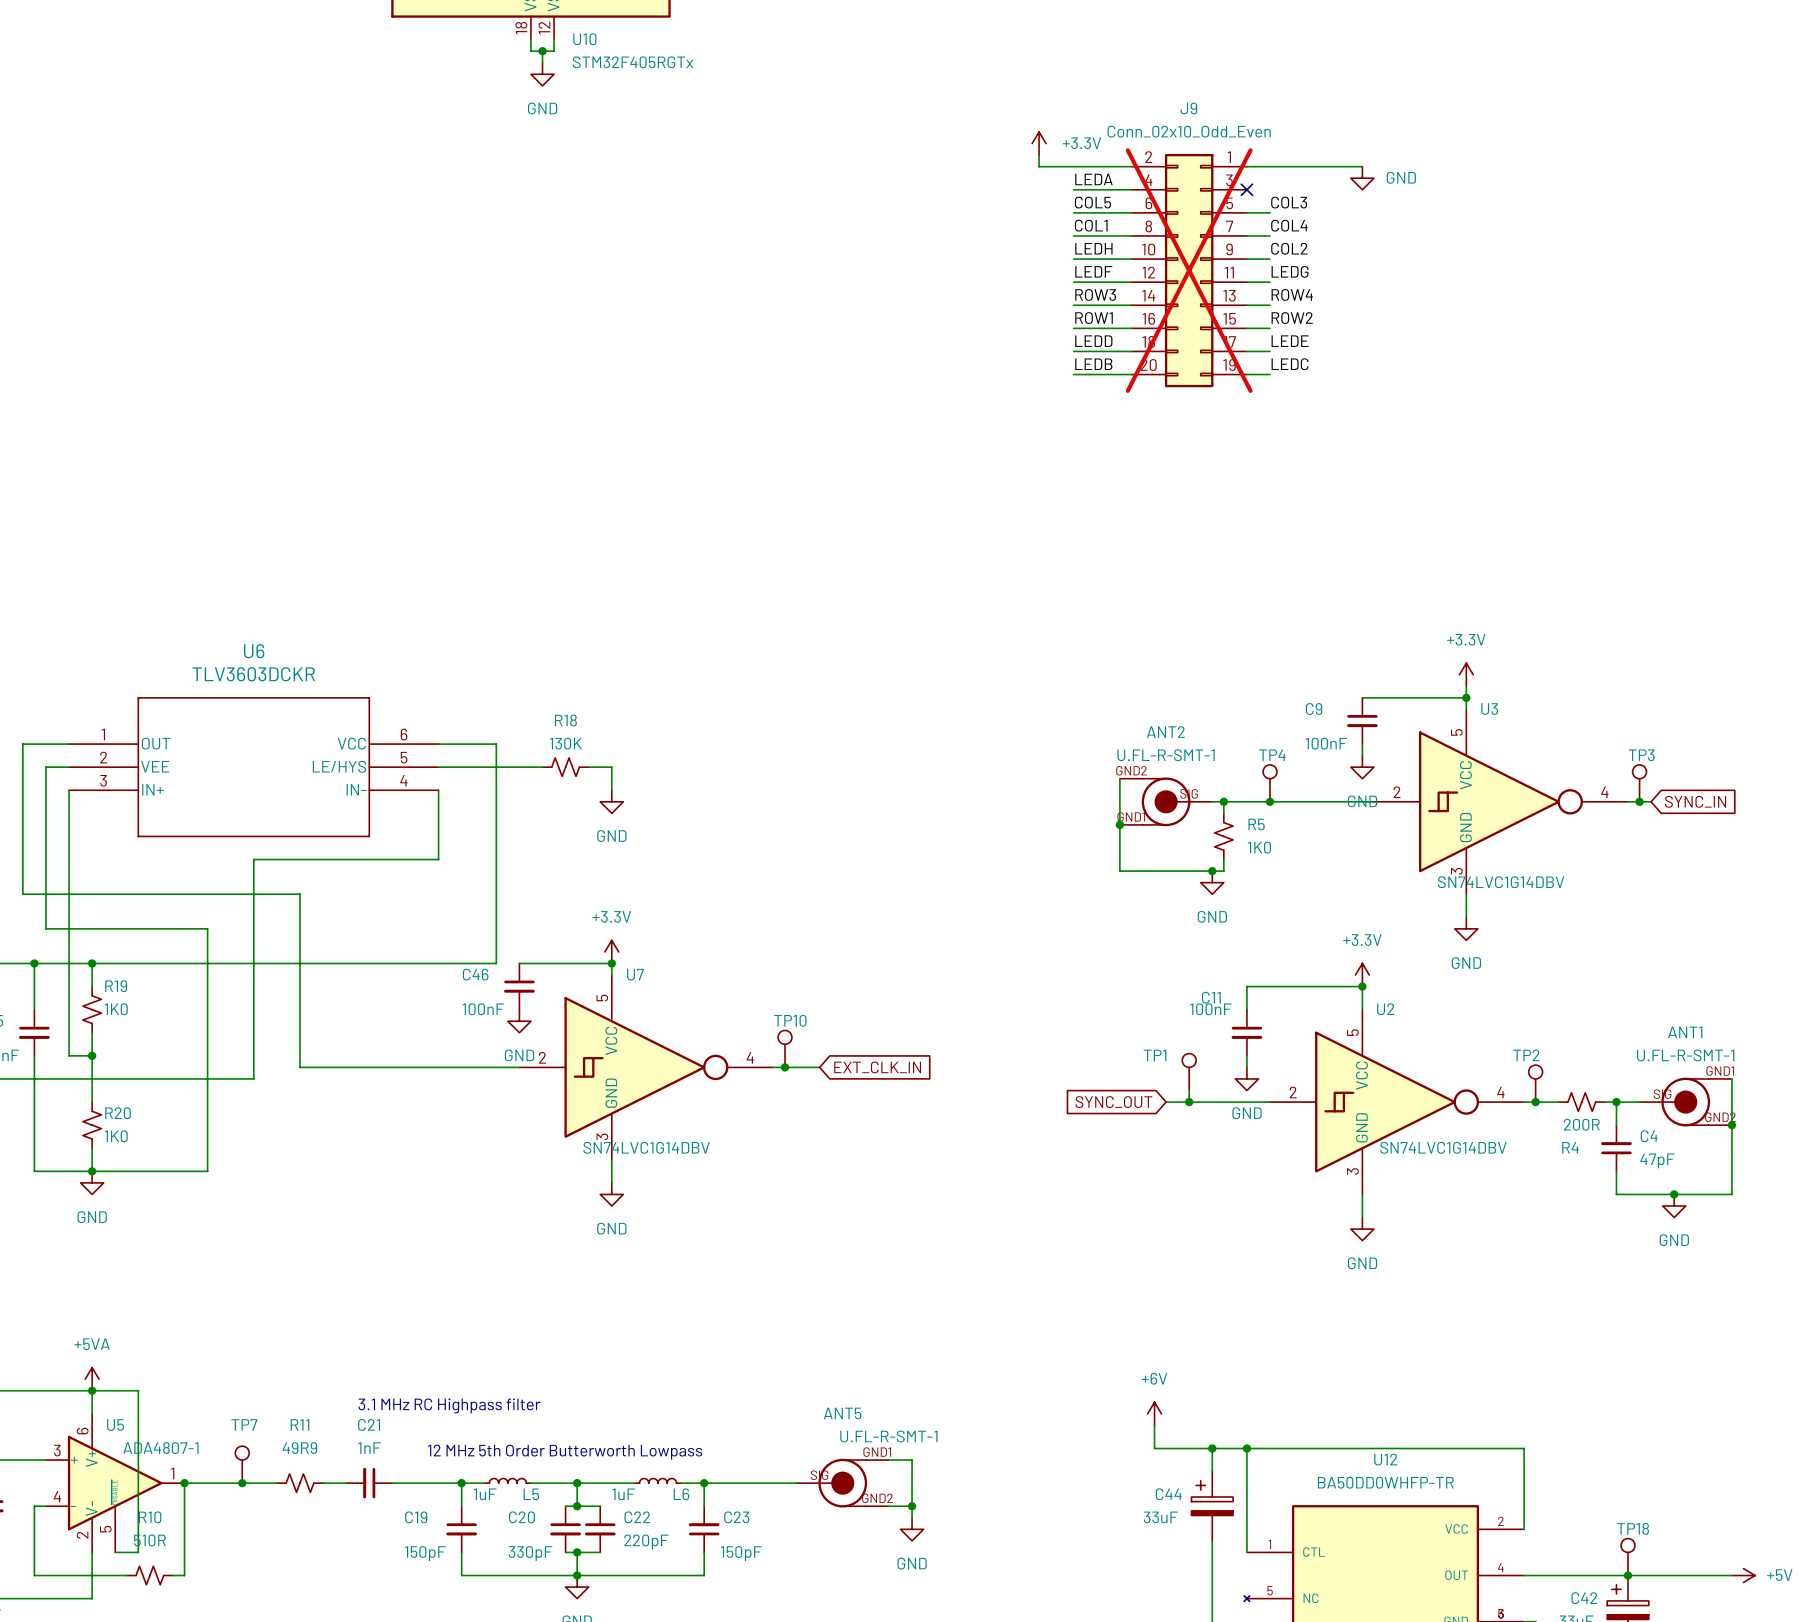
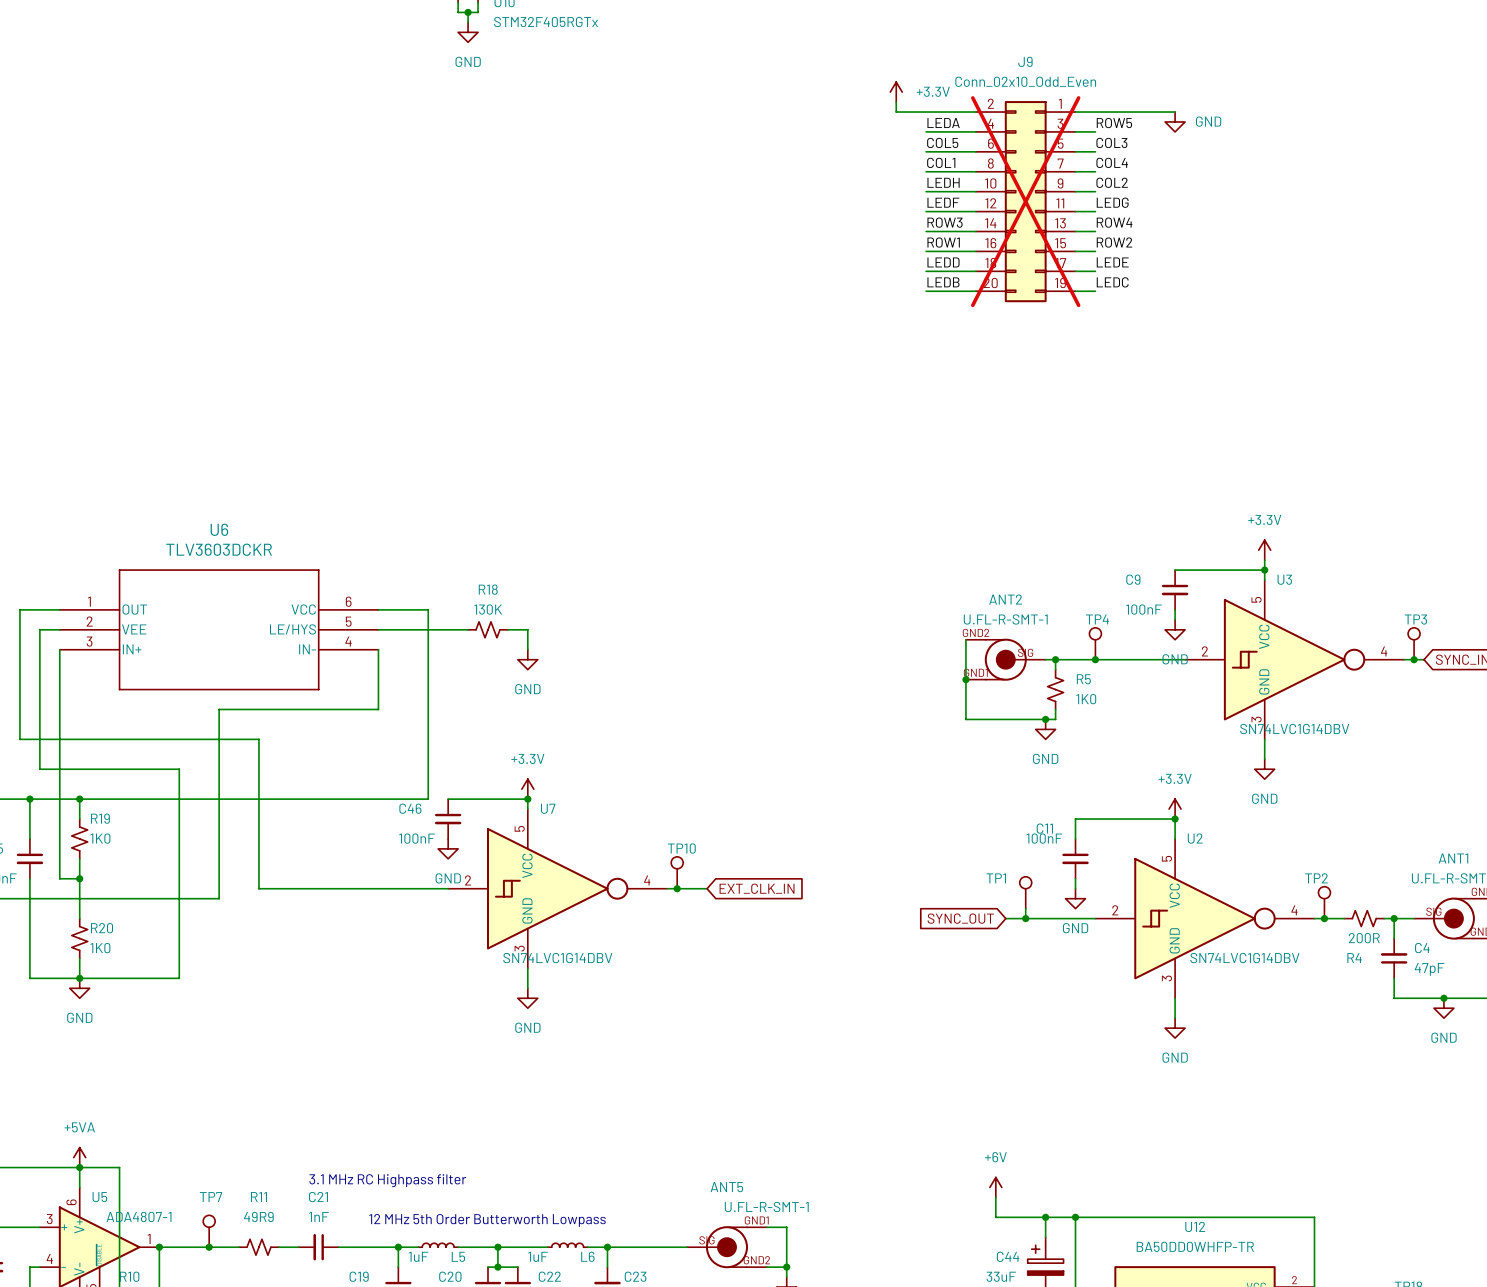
label: none -> ROW5 (1114, 123)
wire: none -> (1075, 131) (1095, 131)
no-connect mark: (1246, 189) -> none

